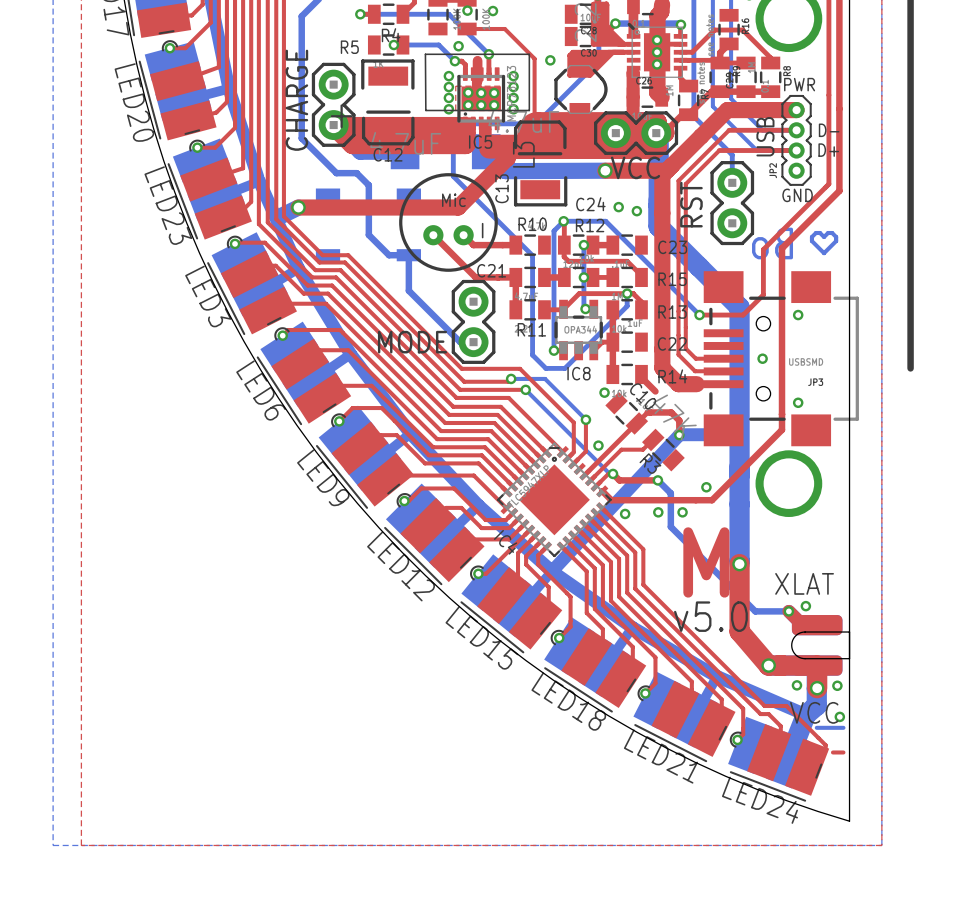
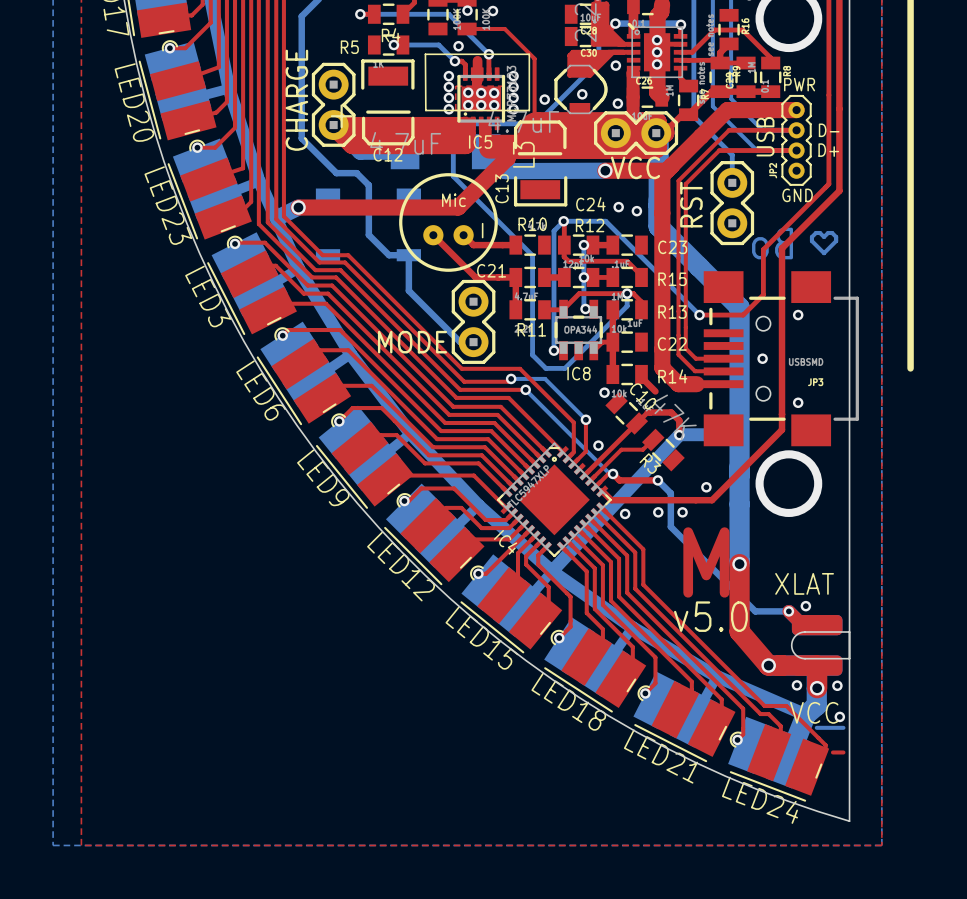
via: (550, 60) -> none
via: none -> (615, 65)
via: none -> (582, 94)
via: none -> (544, 99)
via: none -> (617, 103)

